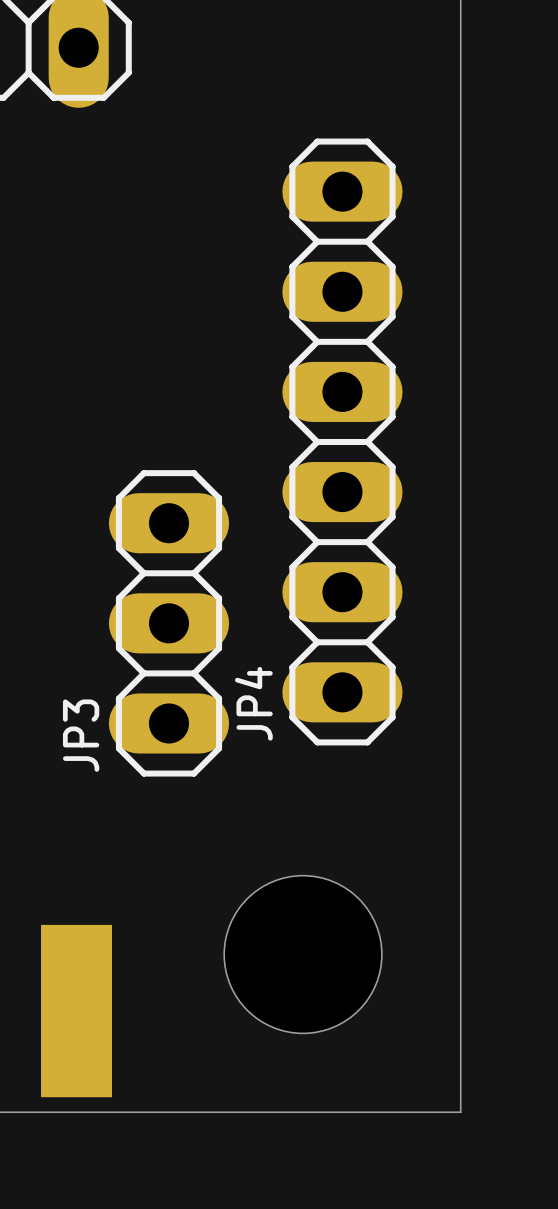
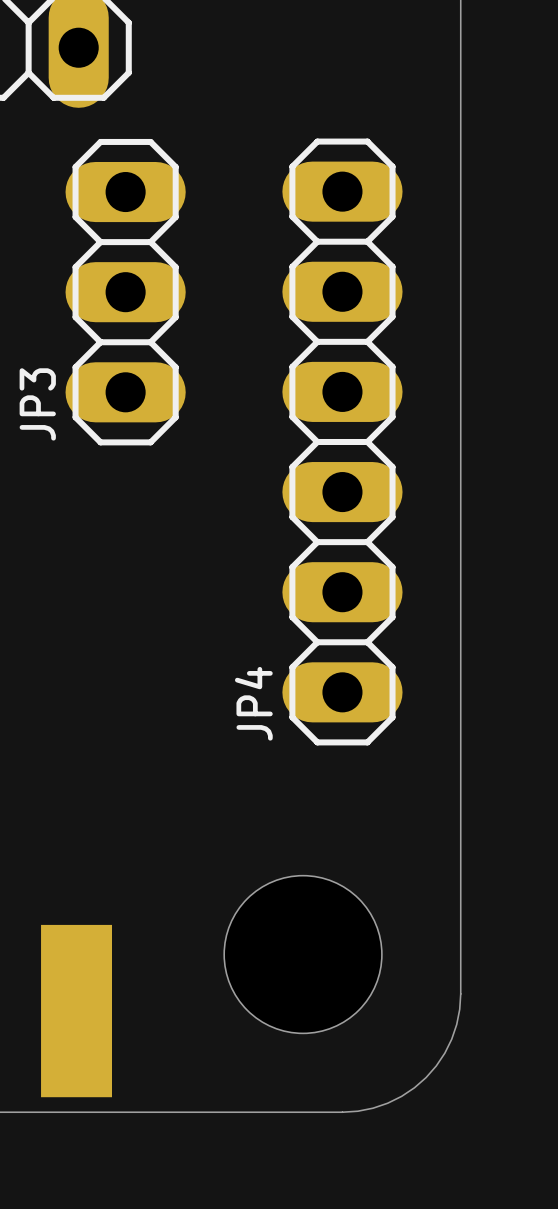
JP3 position: (168, 623) -> (125, 292)
board edge: (460, 993) (460, 1112) (342, 1112) -> (460, 993) (456, 1024) (451, 1039) (436, 1065) (426, 1077) (414, 1087) (387, 1103) (373, 1108) (342, 1112)

